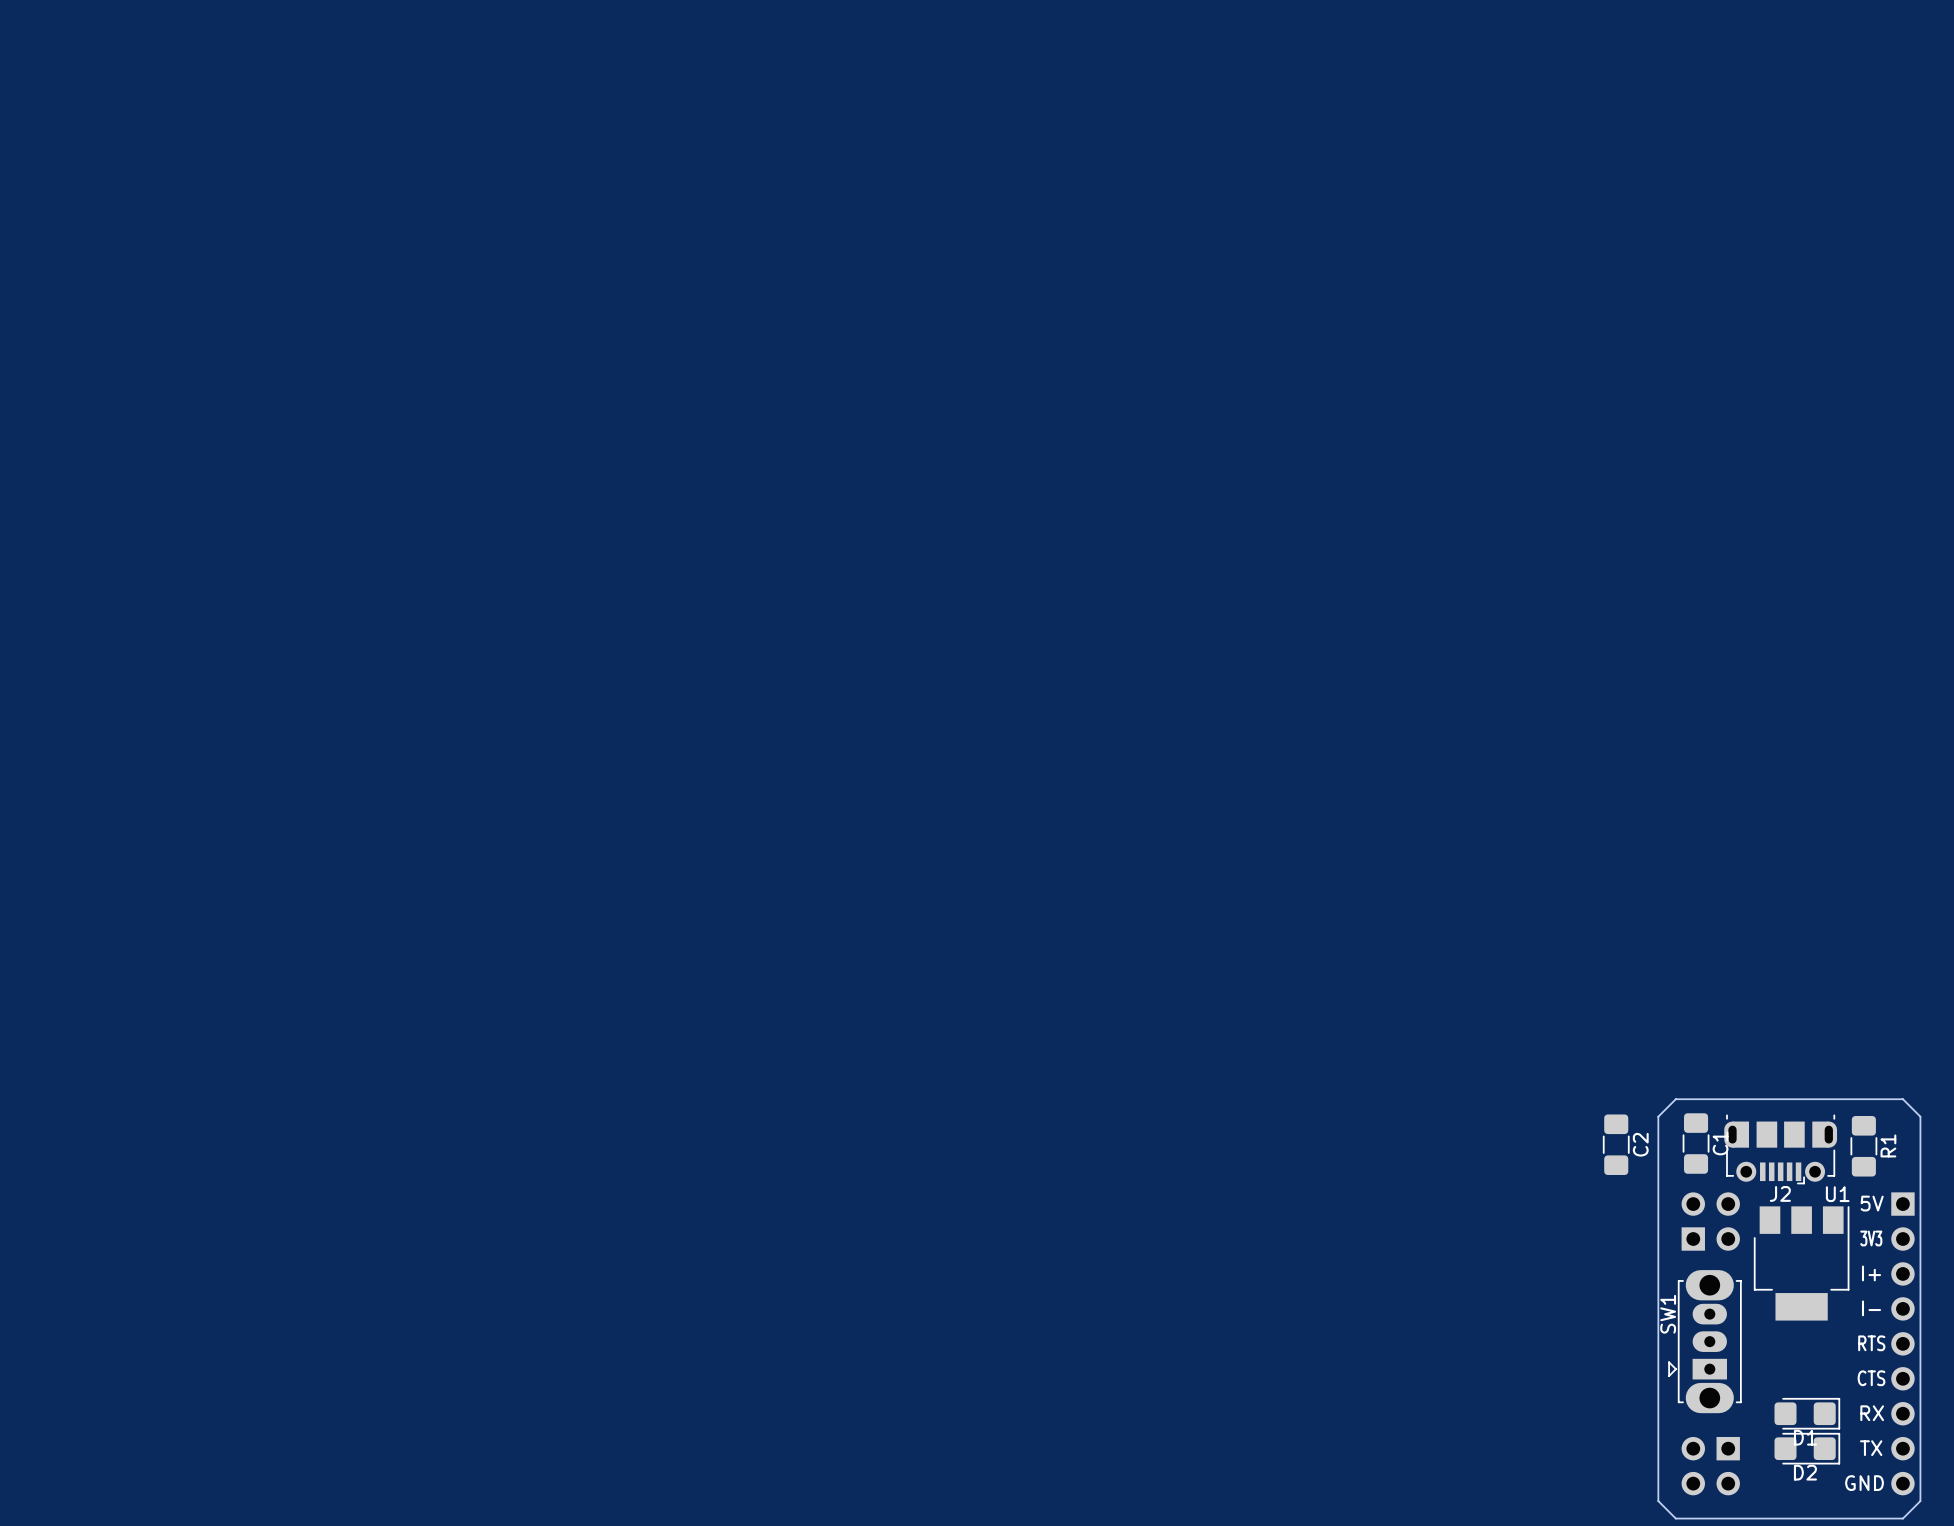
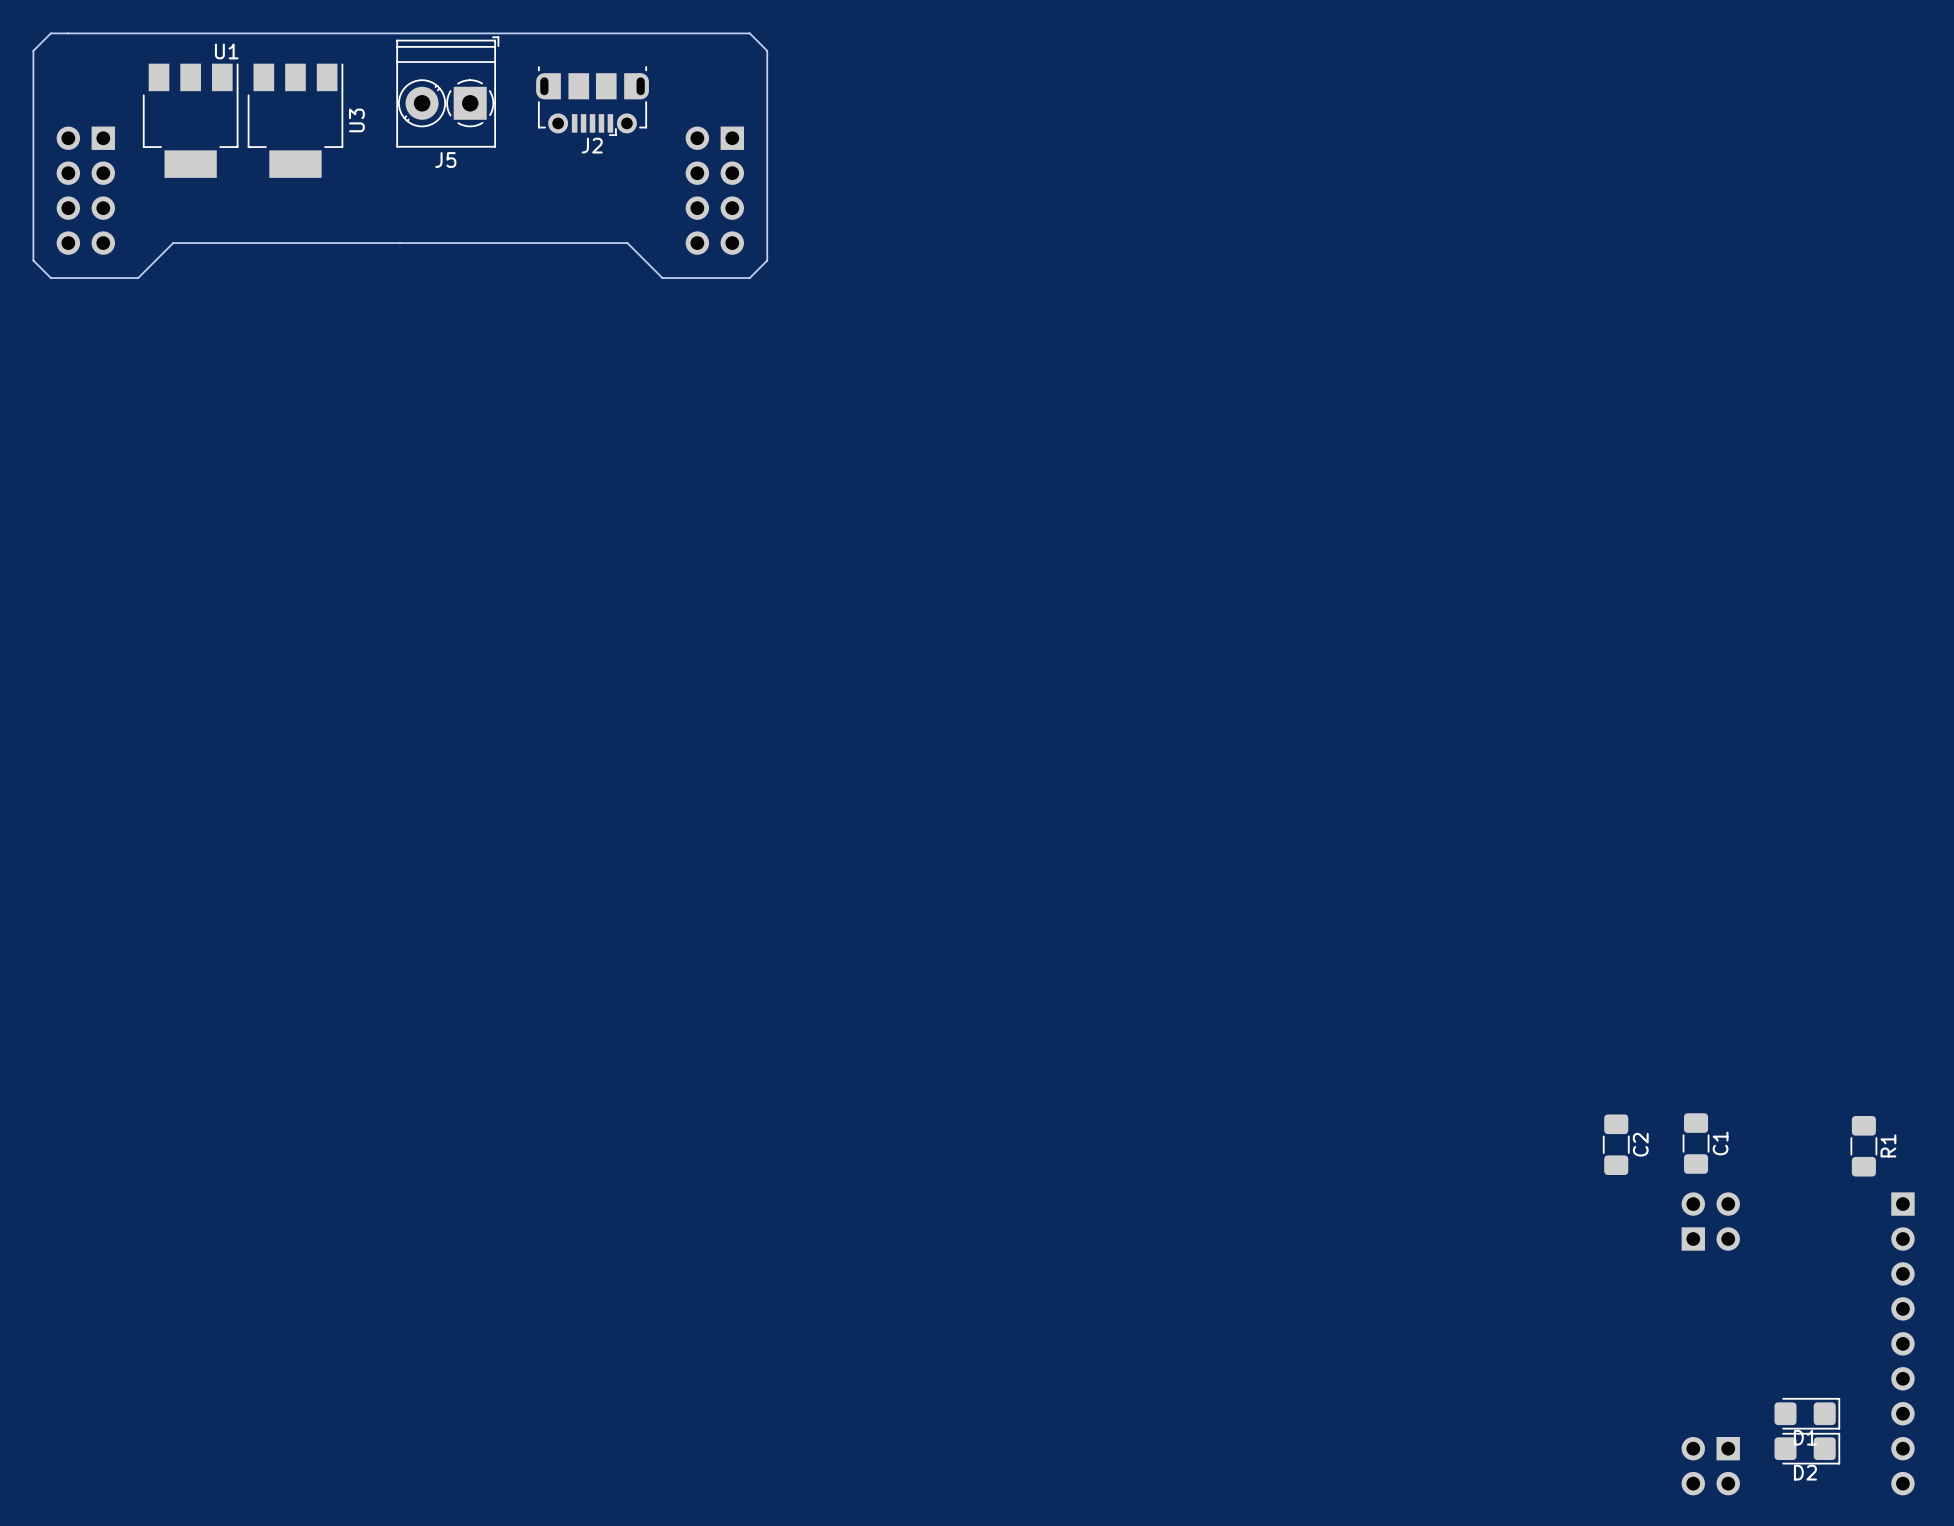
board edge: none -> (50, 33) (33, 50) (33, 260) (50, 278) (138, 278) (173, 243) (627, 243) (662, 278) (749, 278) (767, 260) (767, 50) (749, 33) (50, 33)
J5: none -> (447, 92)
U3: none -> (295, 120)
part: none -> (85, 190)
part: none -> (714, 190)
board edge: (1675, 1099) (1902, 1099) (1920, 1116) (1920, 1501) (1902, 1518) (1675, 1518) (1658, 1501) (1658, 1116) (1675, 1099) -> none
J2 position: (1780, 1149) -> (592, 101)
text: 5V (1872, 1203) -> none
text: 3V3 (1871, 1238) -> none
U1 position: (1801, 1263) -> (190, 120)
text: I+ (1871, 1273) -> none
text: I- (1871, 1308) -> none
SW1: (1704, 1341) -> none
text: RTS (1871, 1343) -> none
text: CTS (1871, 1378) -> none
text: RX (1872, 1413) -> none
text: TX (1871, 1448) -> none
text: GND (1864, 1483) -> none

